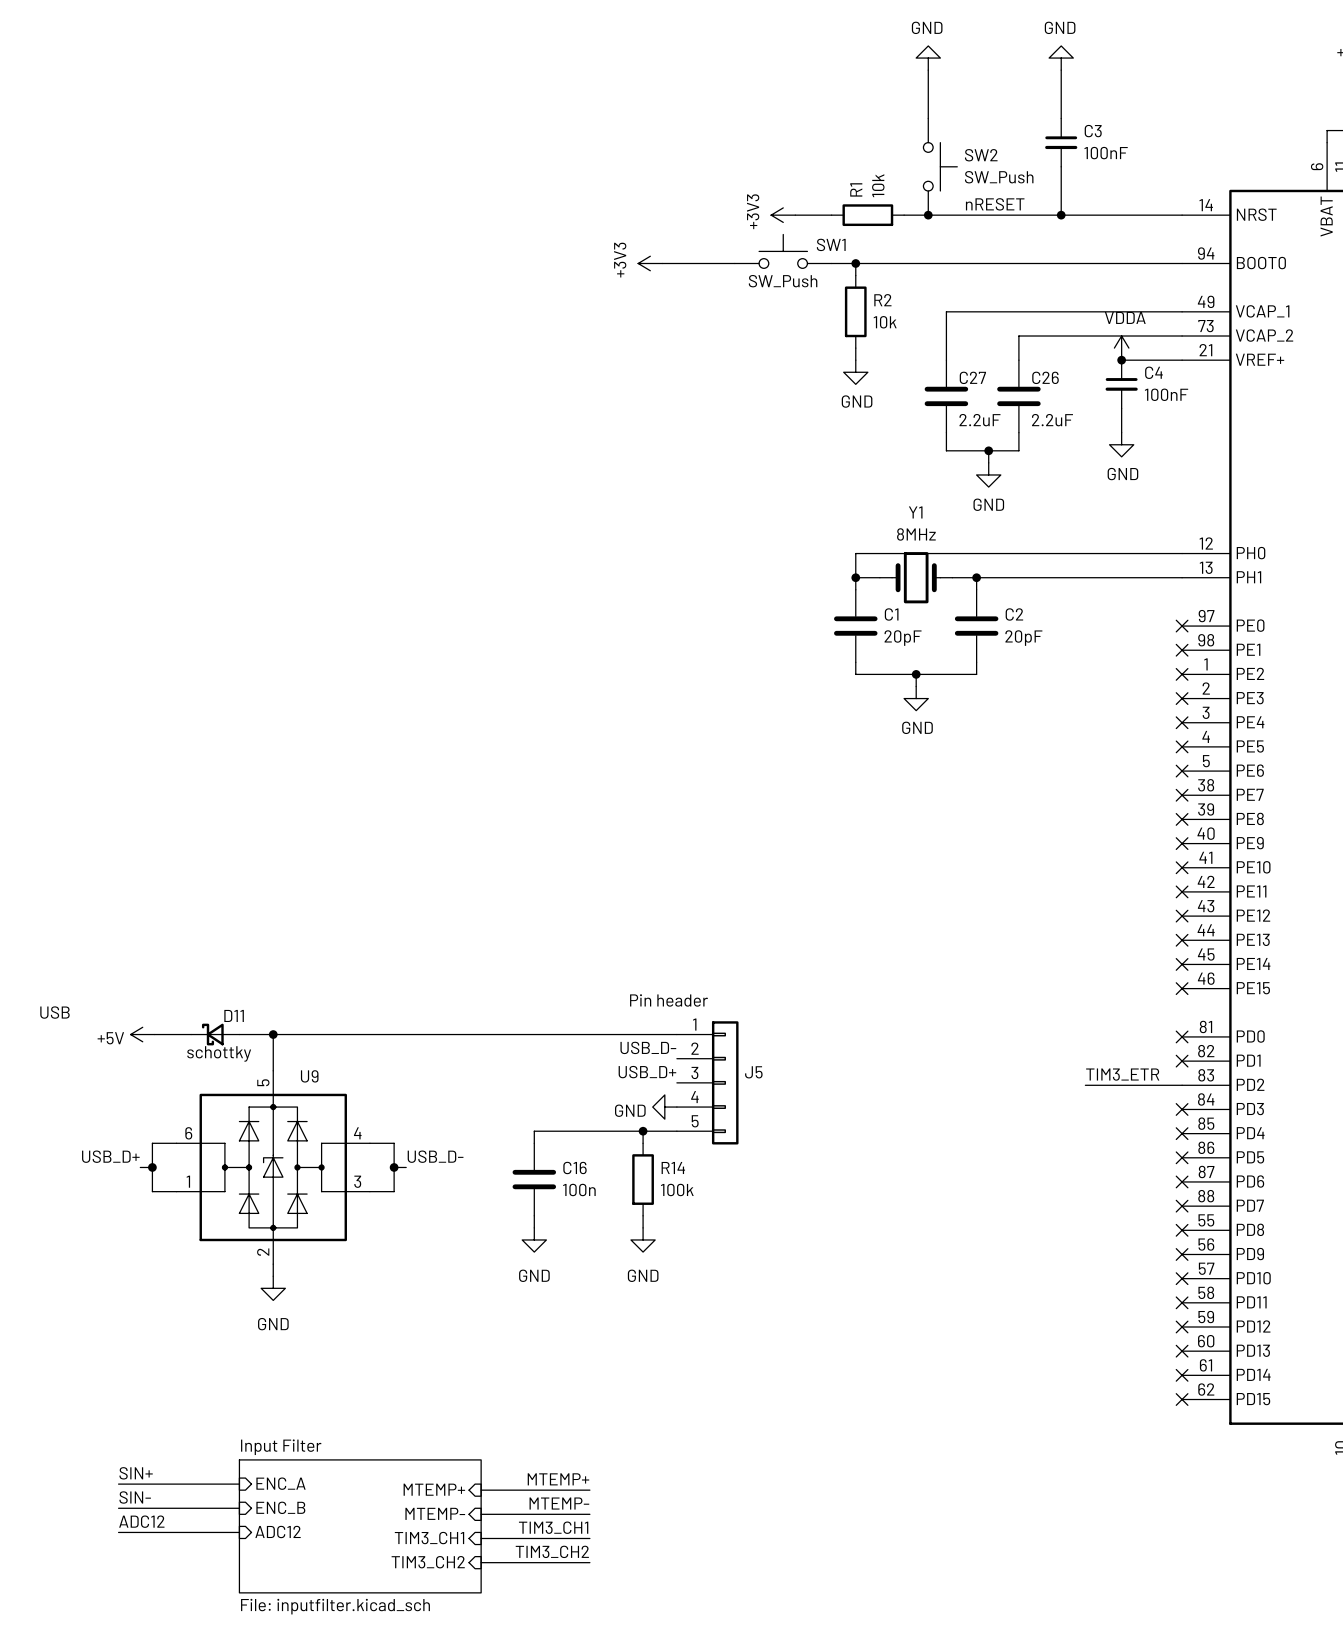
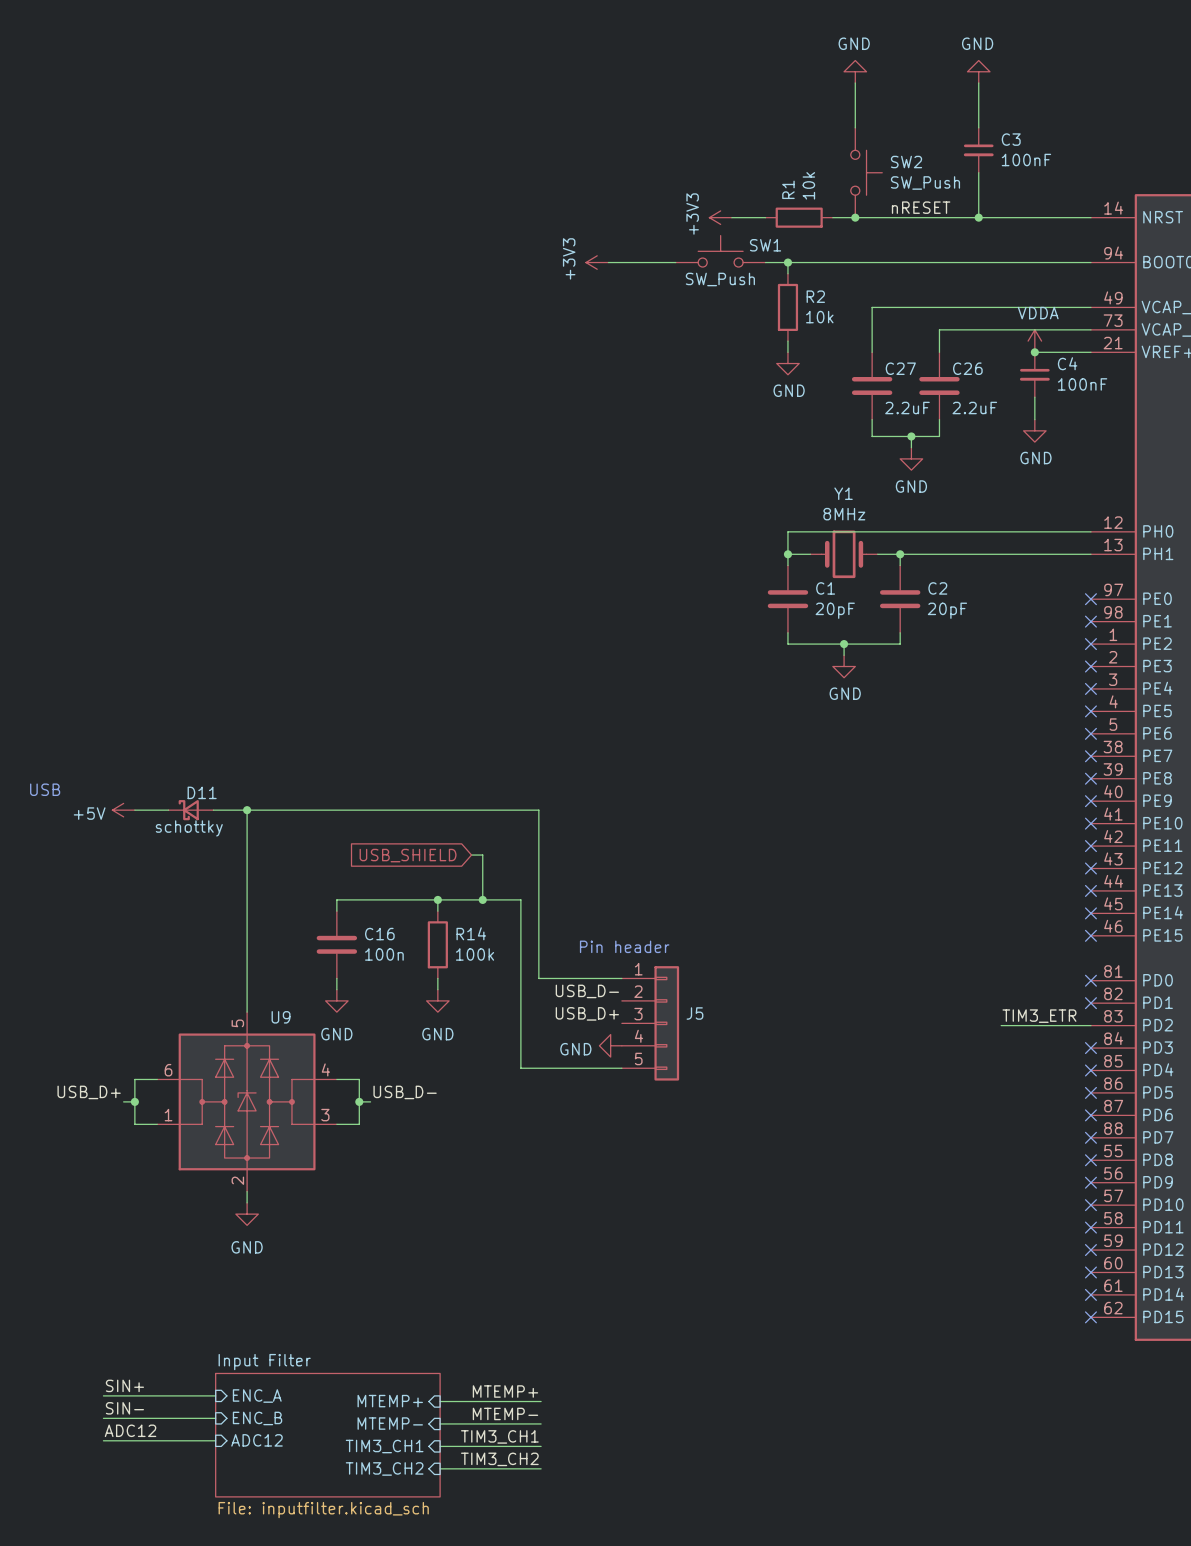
wire: none -> (247, 810) (247, 978)
junction: none -> (247, 810)
global label: none -> USB_SHIELD (408, 855)
wire: none -> (471, 855) (482, 855) (482, 899)
wire: none -> (437, 899) (437, 911)
junction: none -> (437, 899)
junction: none -> (482, 899)
text position: USB (54, 1012) -> USB (45, 789)
power symbol position: +5V (142, 1034) -> +5V (123, 810)
wire: (154, 1034) (191, 1034) -> (134, 810) (168, 810)
D11 position: (215, 1034) -> (190, 810)
wire: (239, 1034) (587, 1034) -> (213, 810) (538, 810) (538, 978)
junction: (273, 1034) -> none
wire: none -> (336, 978) (336, 989)
power symbol: none -> GND (336, 1000)
power symbol: none -> GND (437, 1000)
wire: (568, 1131) (534, 1131) (534, 1143) -> (520, 1068) (520, 899) (336, 899) (336, 911)
wire: (643, 1131) (643, 1143) -> none
junction: (643, 1131) -> none
C16 position: (534, 1179) -> (336, 944)
R14 position: (643, 1179) -> (437, 944)
wire: (534, 1215) (534, 1227) -> (437, 978) (437, 989)
wire: (643, 1215) (643, 1227) -> none
power symbol: GND (534, 1239) -> none
power symbol: GND (643, 1239) -> none

